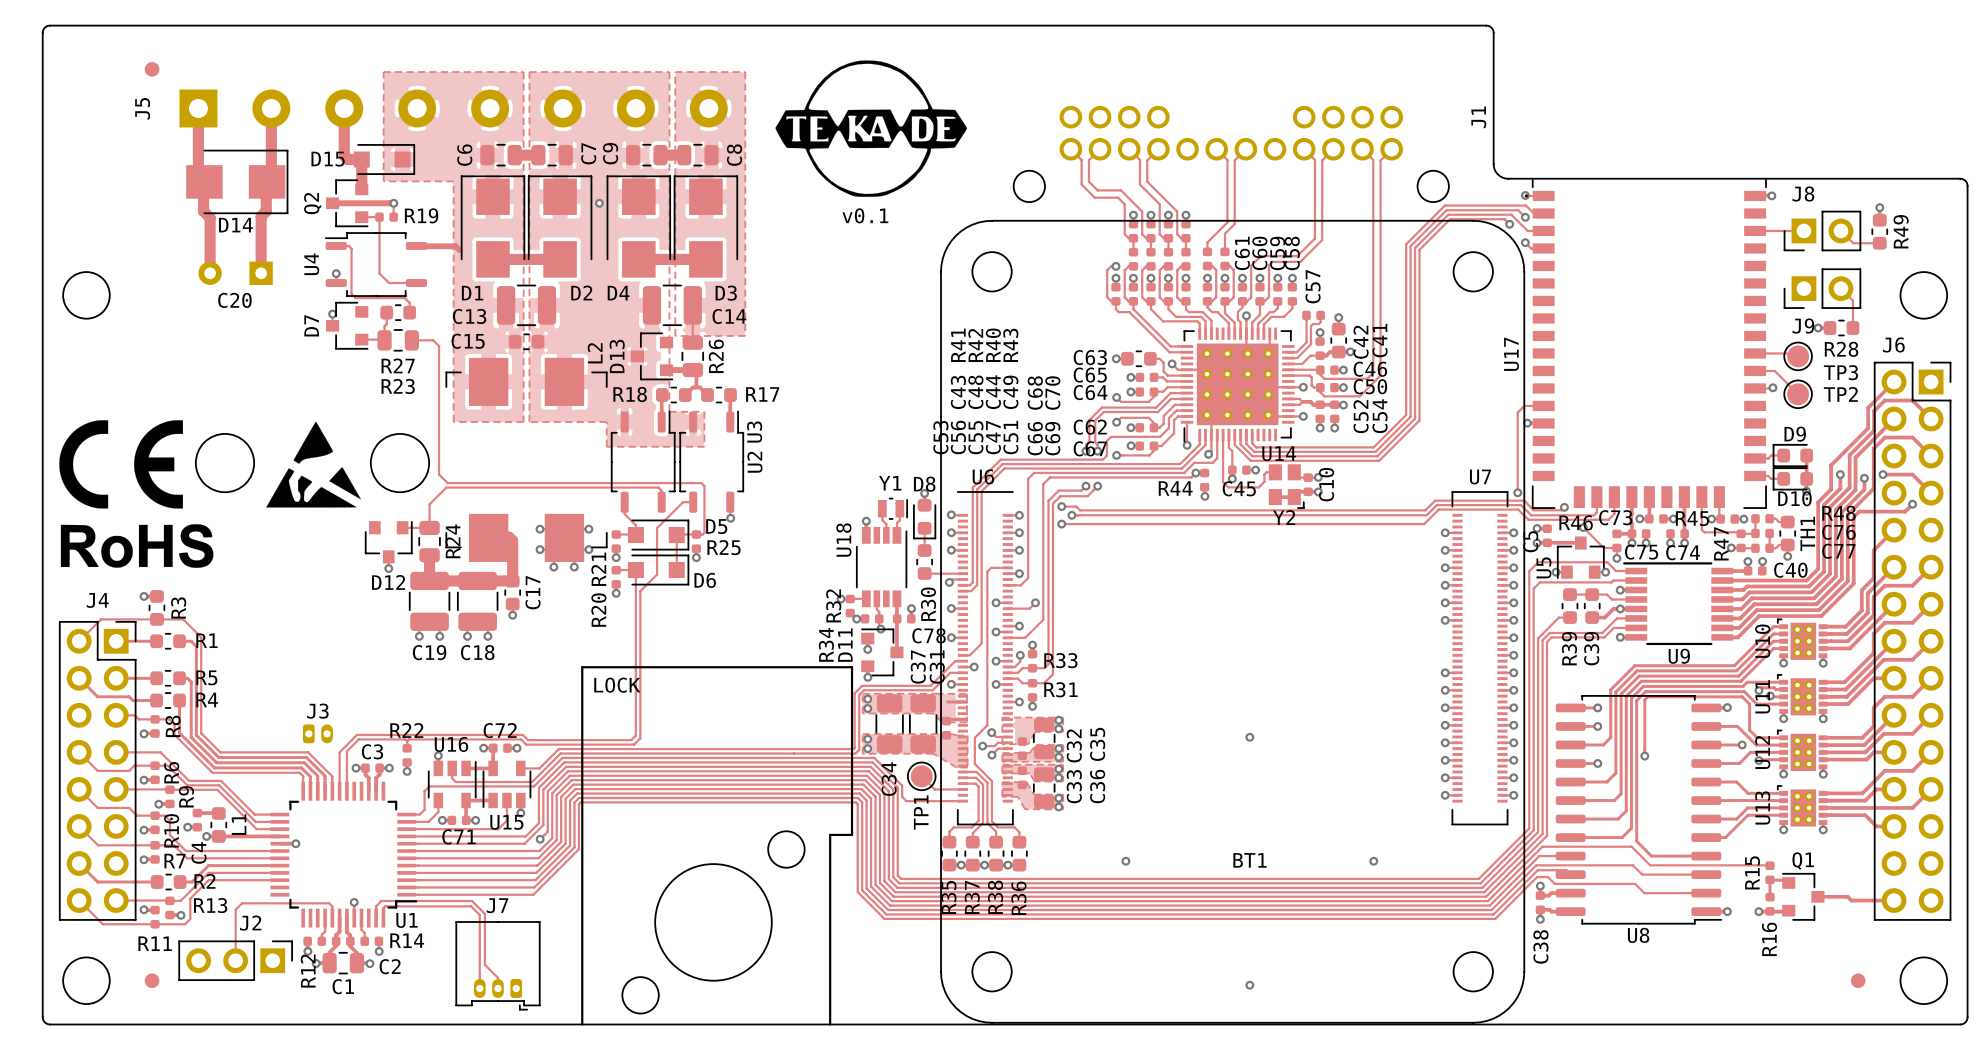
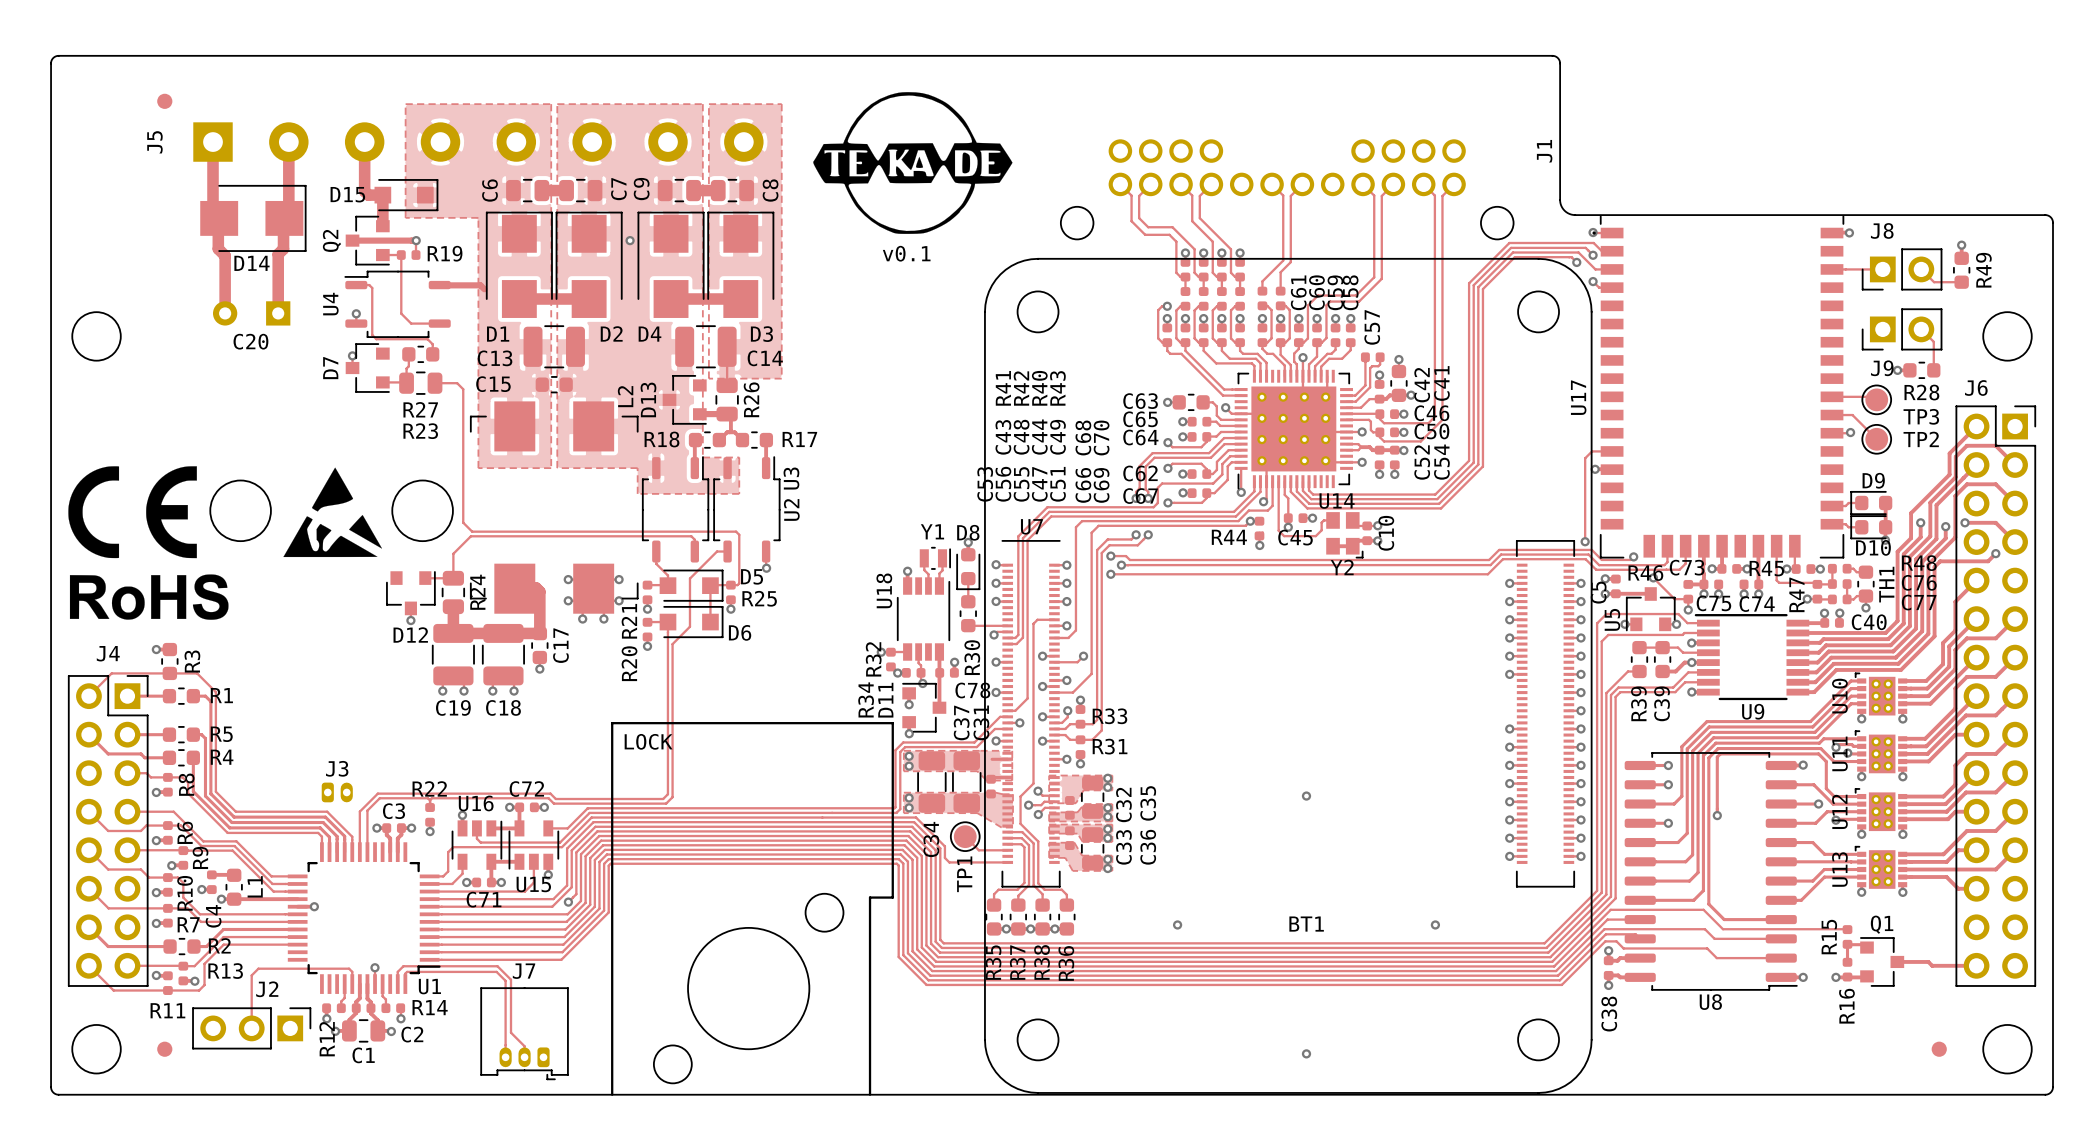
U7 name position: U7 (1480, 477) -> U7 (1031, 526)
U7 footprint: [1451, 491, 1509, 826] -> [984, 257, 1593, 1094]
U6: (1232, 621) -> none

